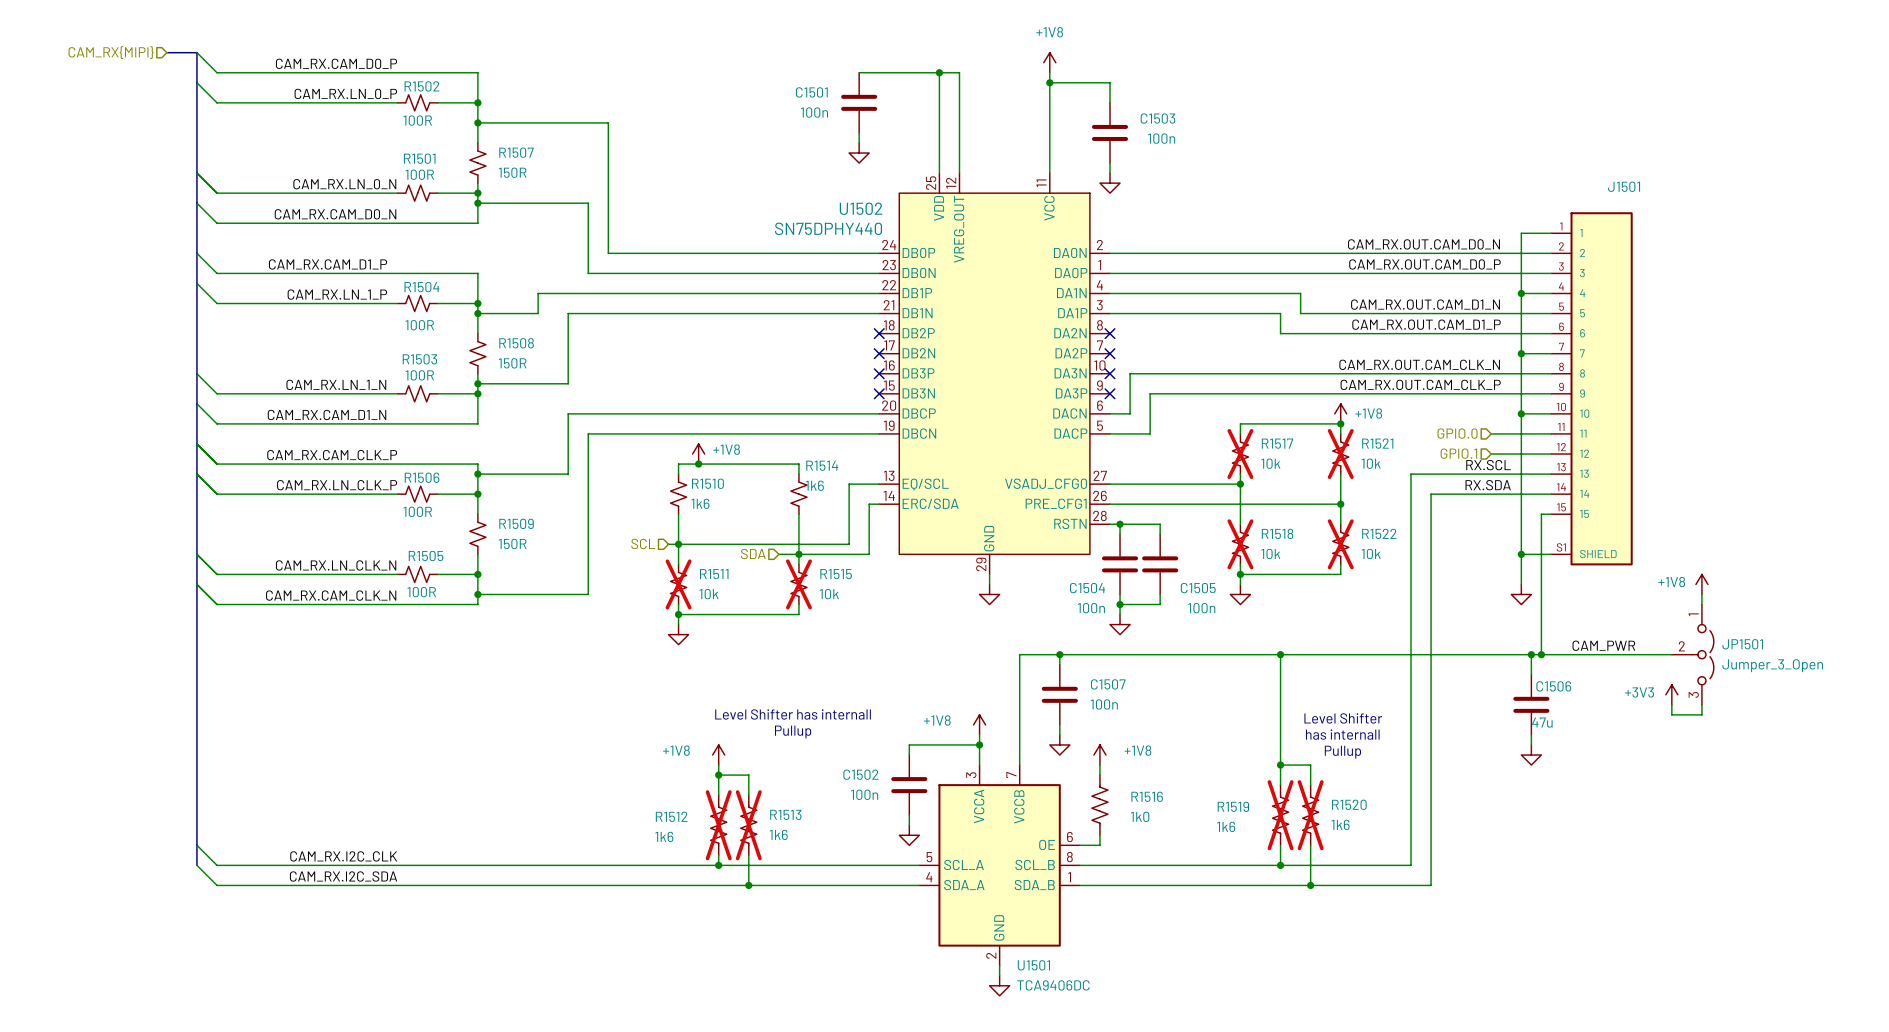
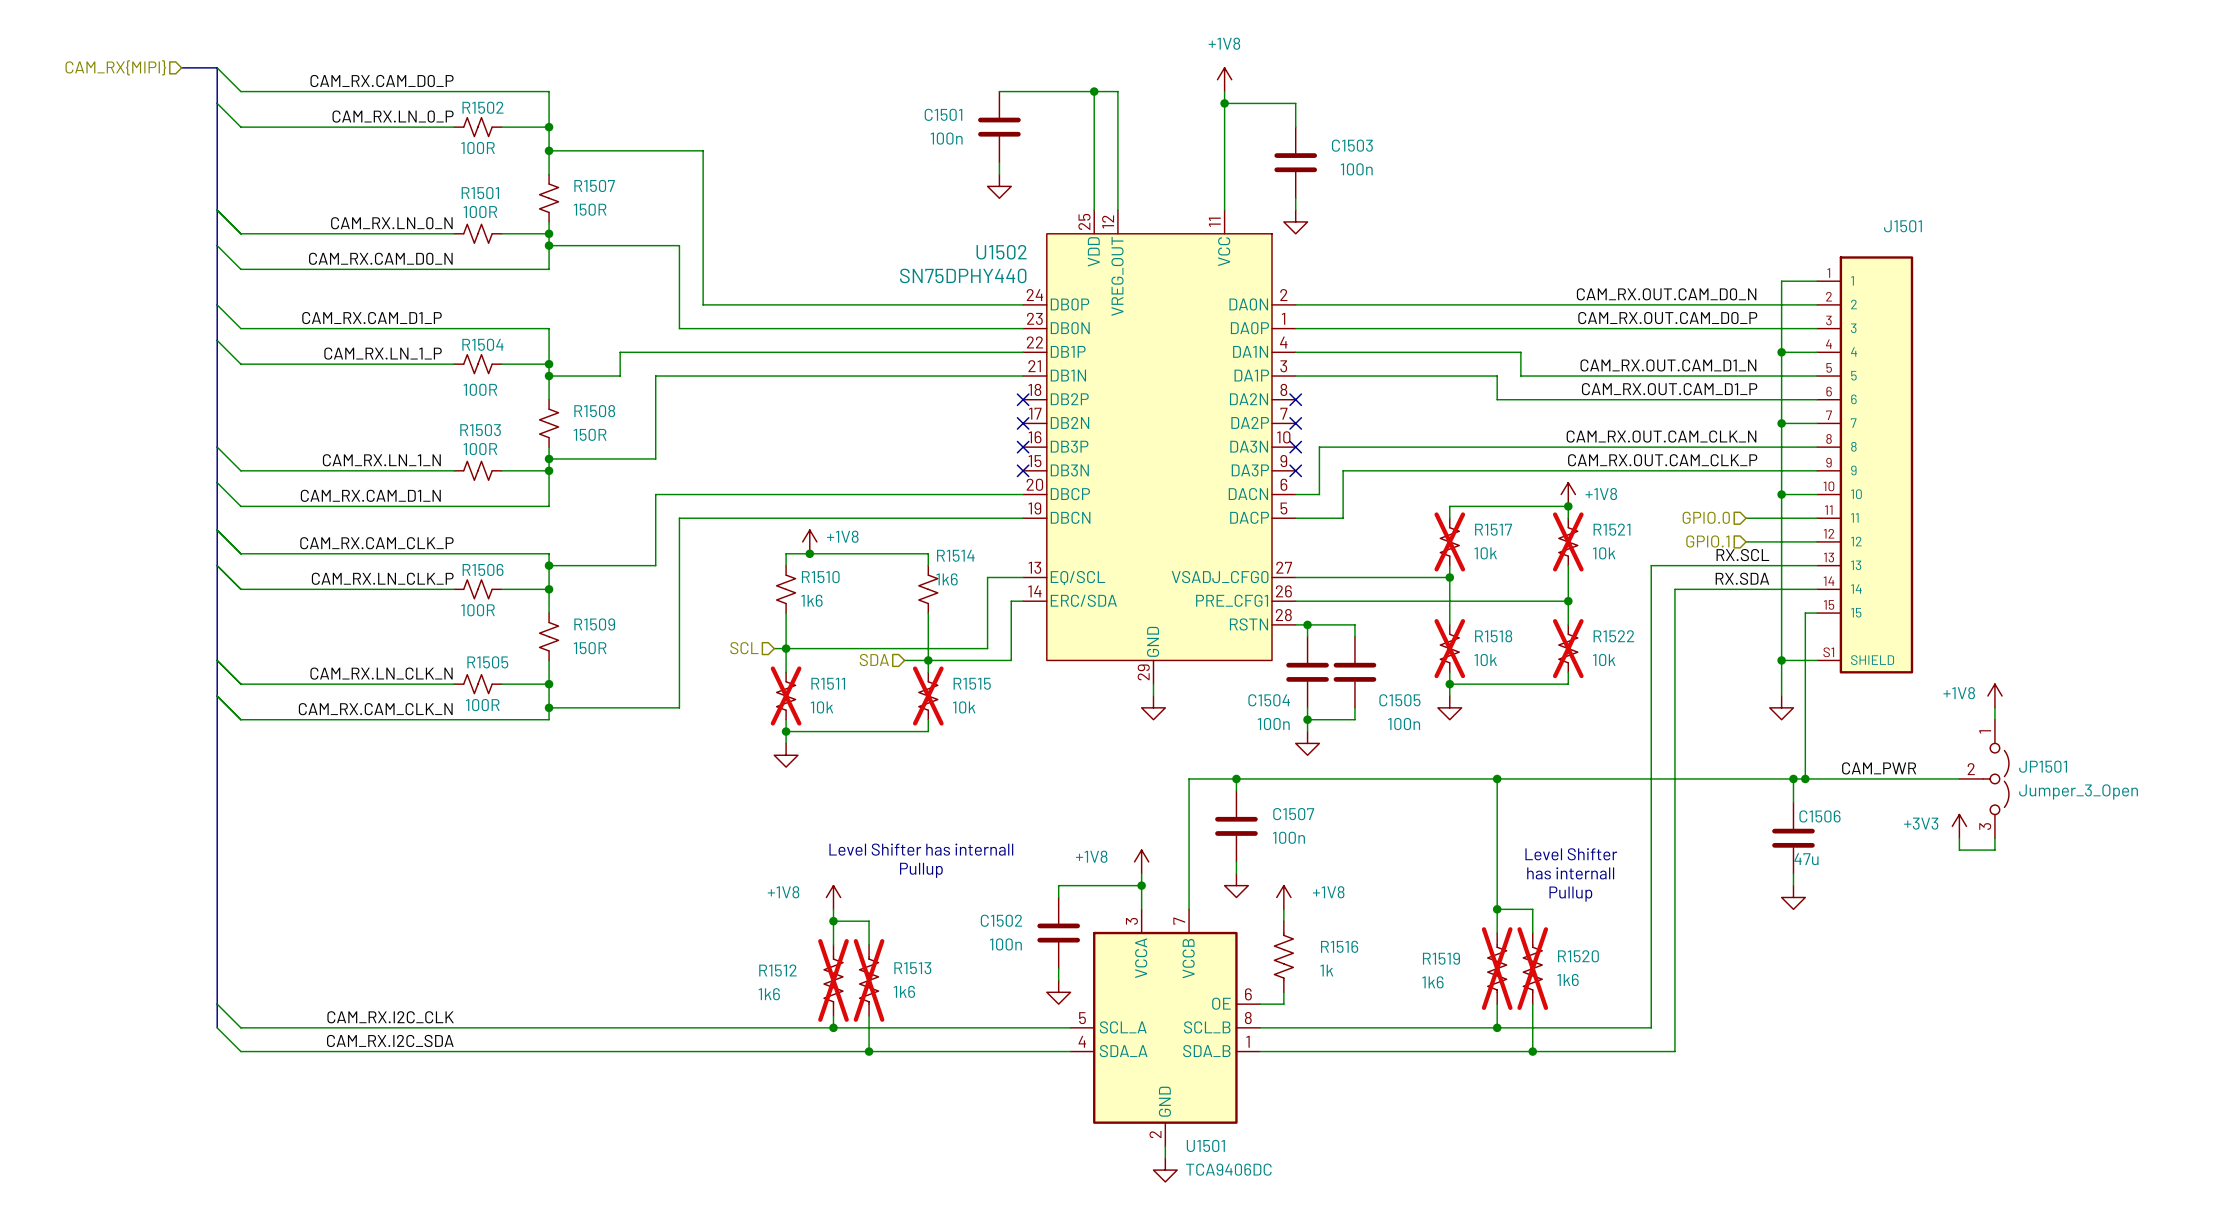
R1516 value: 1k0 (1140, 816) -> 1k (1326, 970)

